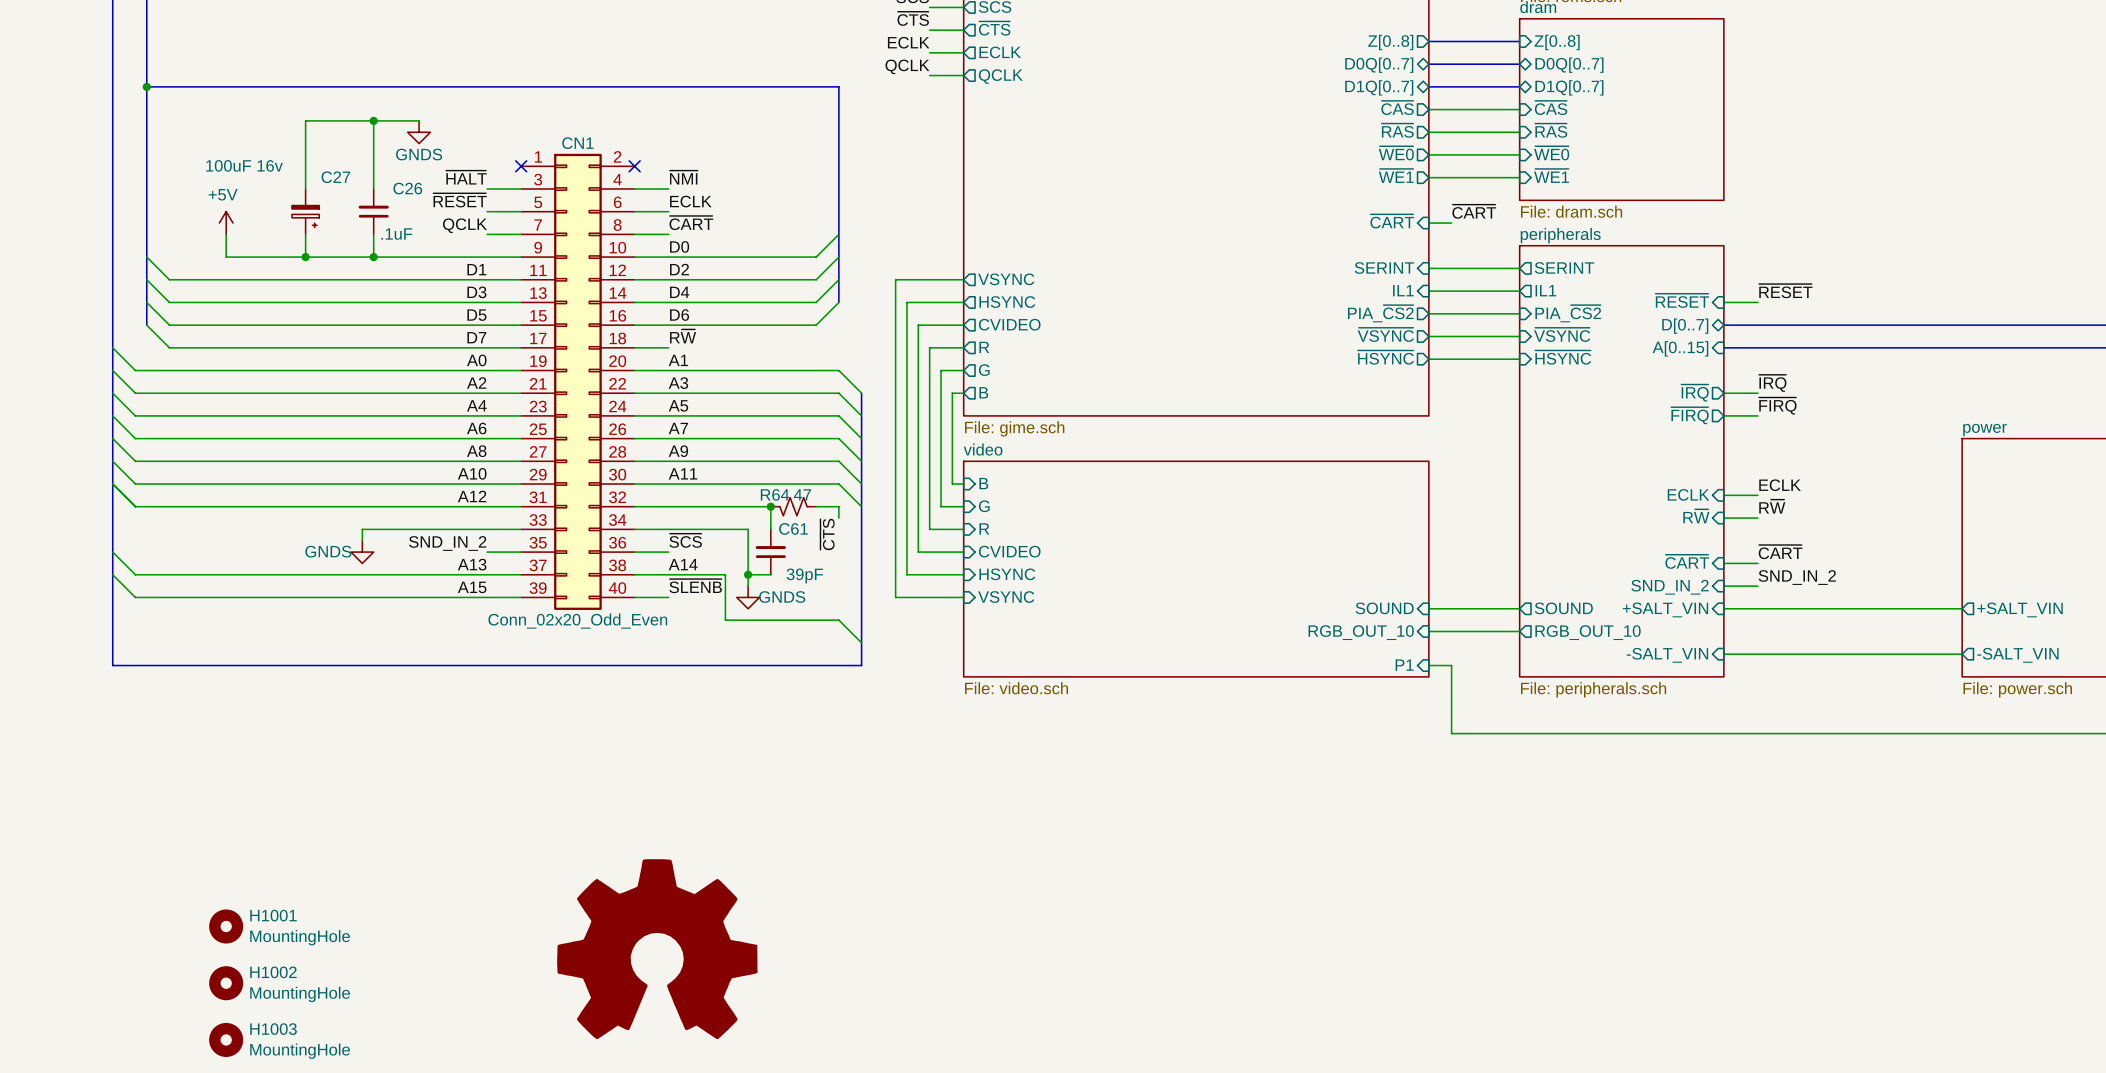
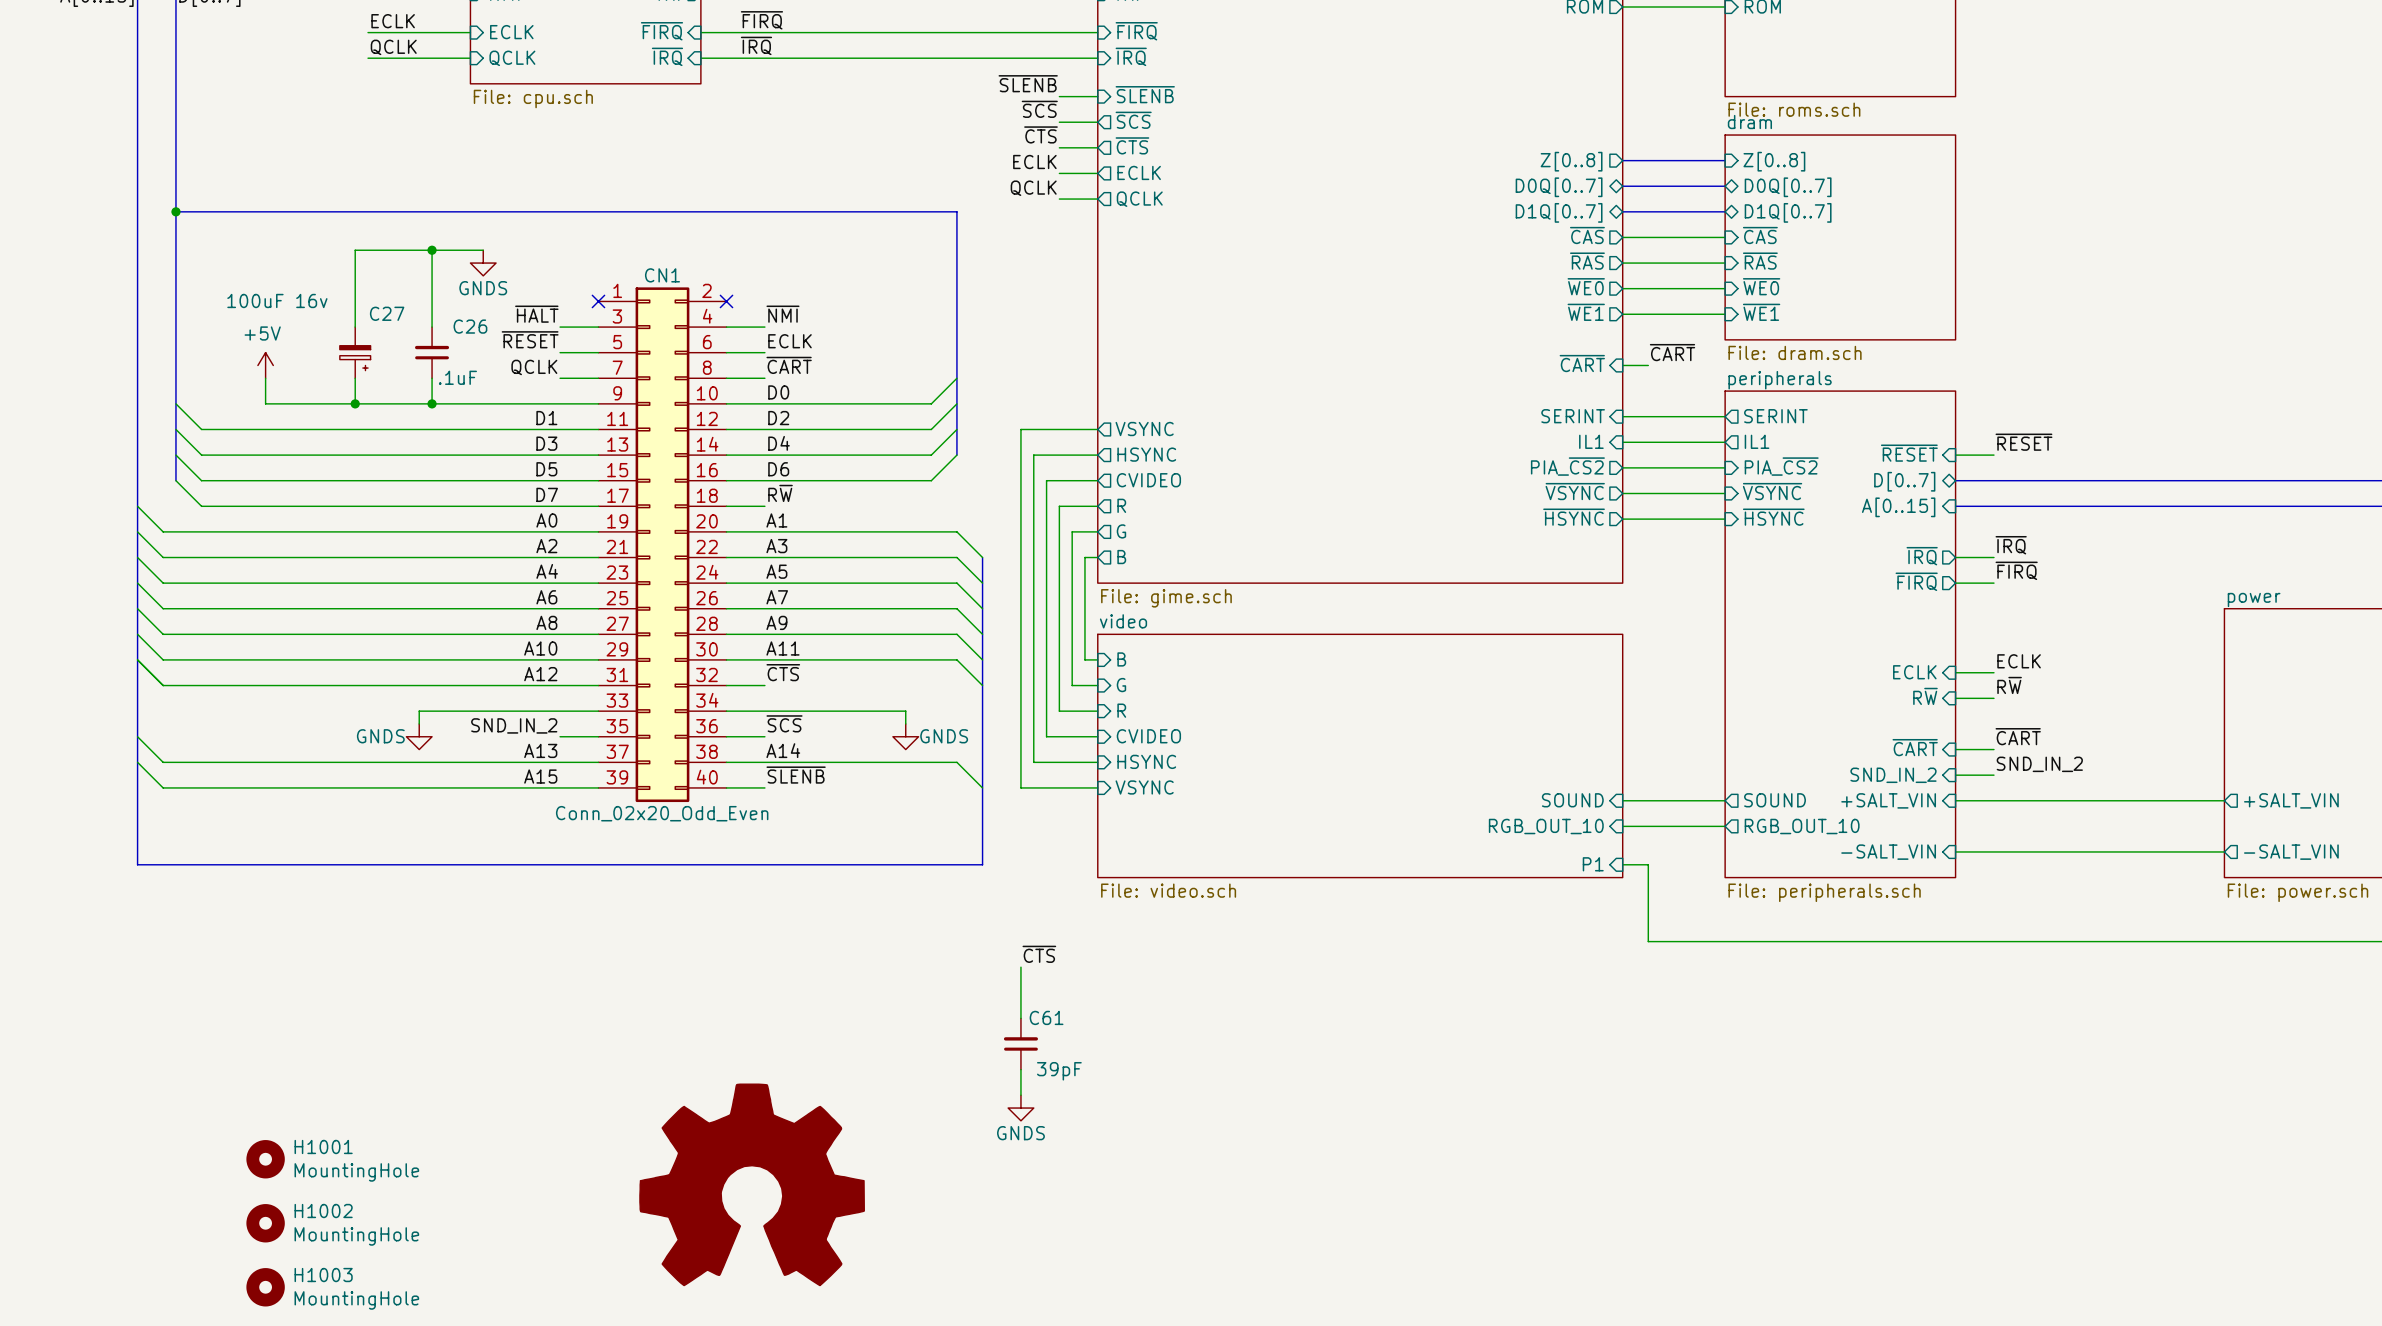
label: none -> ~{CTS} (783, 672)
wire: (668, 506) (770, 506) (770, 529) -> none
junction: (770, 506) -> none
R64: 47 (793, 506) -> none
wire: (816, 506) (838, 506) (838, 518) -> none
wire: (748, 529) (748, 586) -> (854, 711) (905, 711) (905, 723)
label: ~{CTS} (827, 534) -> none
C61 position: (770, 552) -> (1020, 1044)
wire: (725, 574) (725, 620) (838, 620) (861, 642) -> (828, 762) (854, 762)
junction: (748, 574) -> none
wire: none -> (880, 762) (956, 762) (982, 787)
power symbol position: GNDS (748, 597) -> GNDS (905, 736)
label: none -> ~{CTS} (1039, 954)
wire: none -> (1020, 967) (1020, 1018)
wire: none -> (1020, 1069) (1020, 1095)
power symbol: none -> GNDS (1020, 1108)

